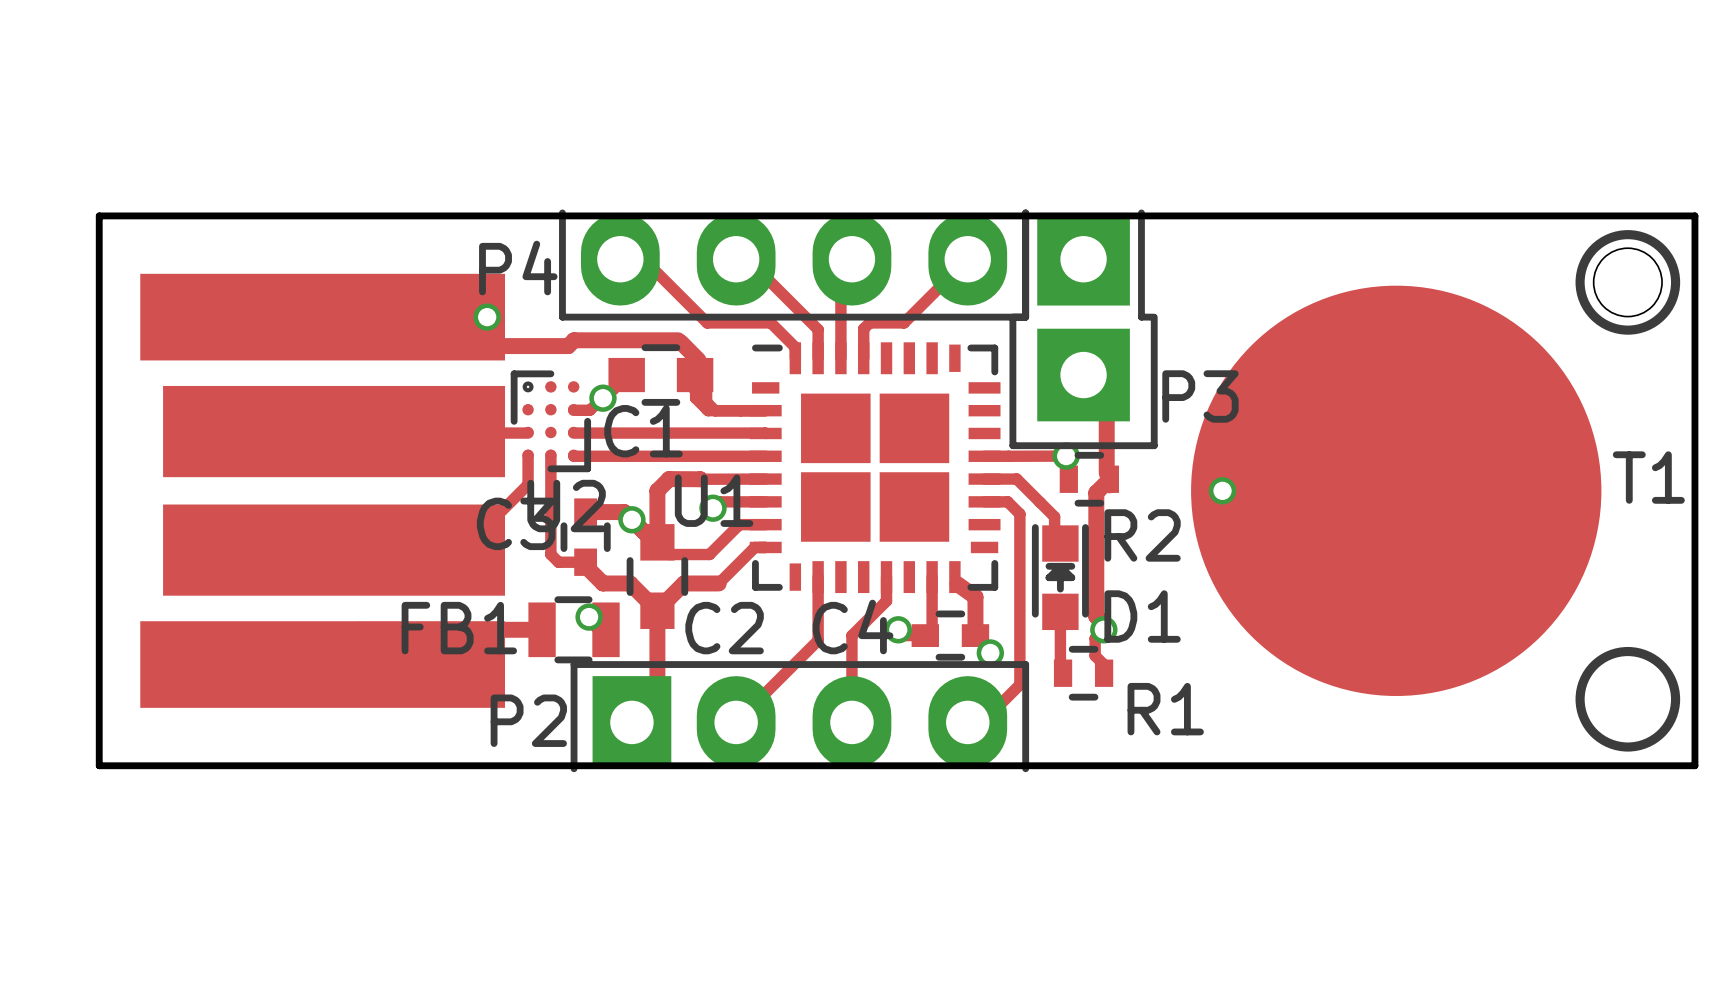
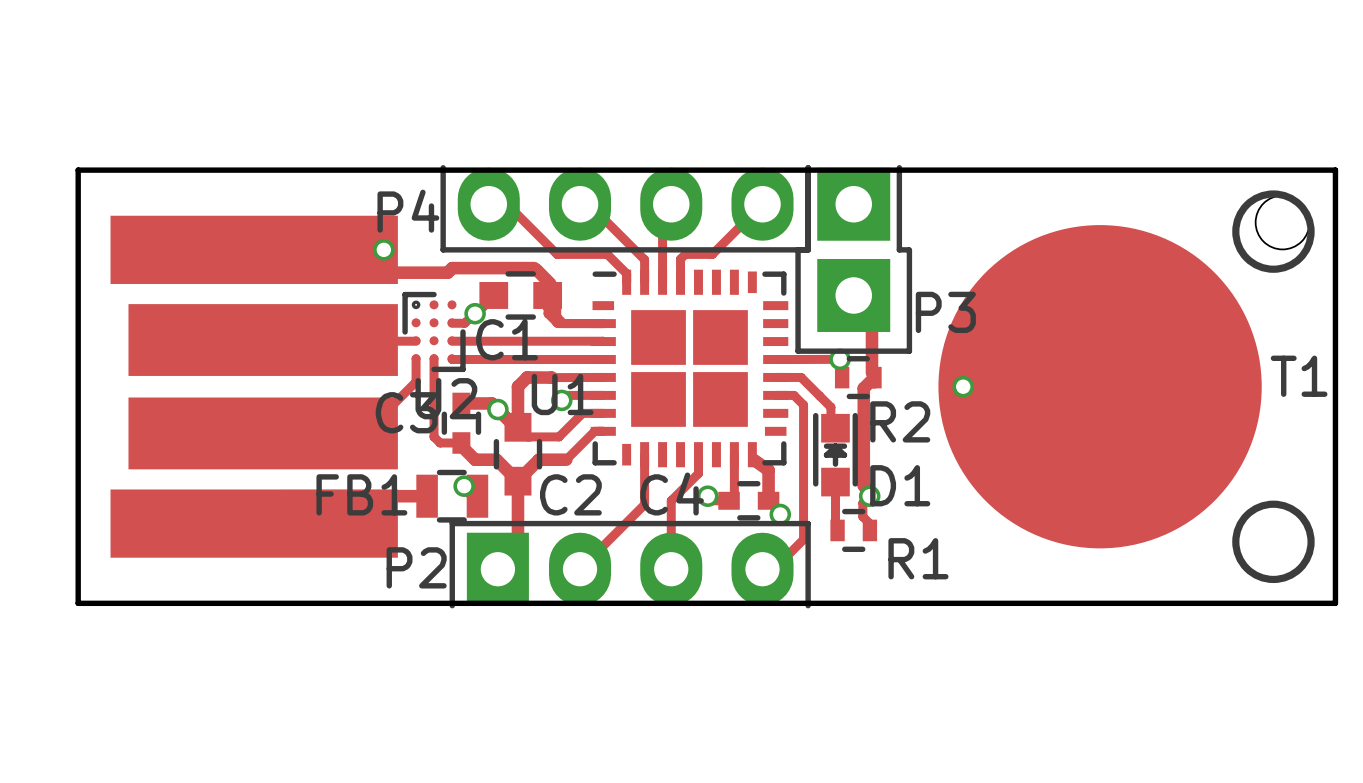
drawing position: (1627, 282) -> (1273, 231)
drawing position: (1627, 699) -> (1273, 541)

